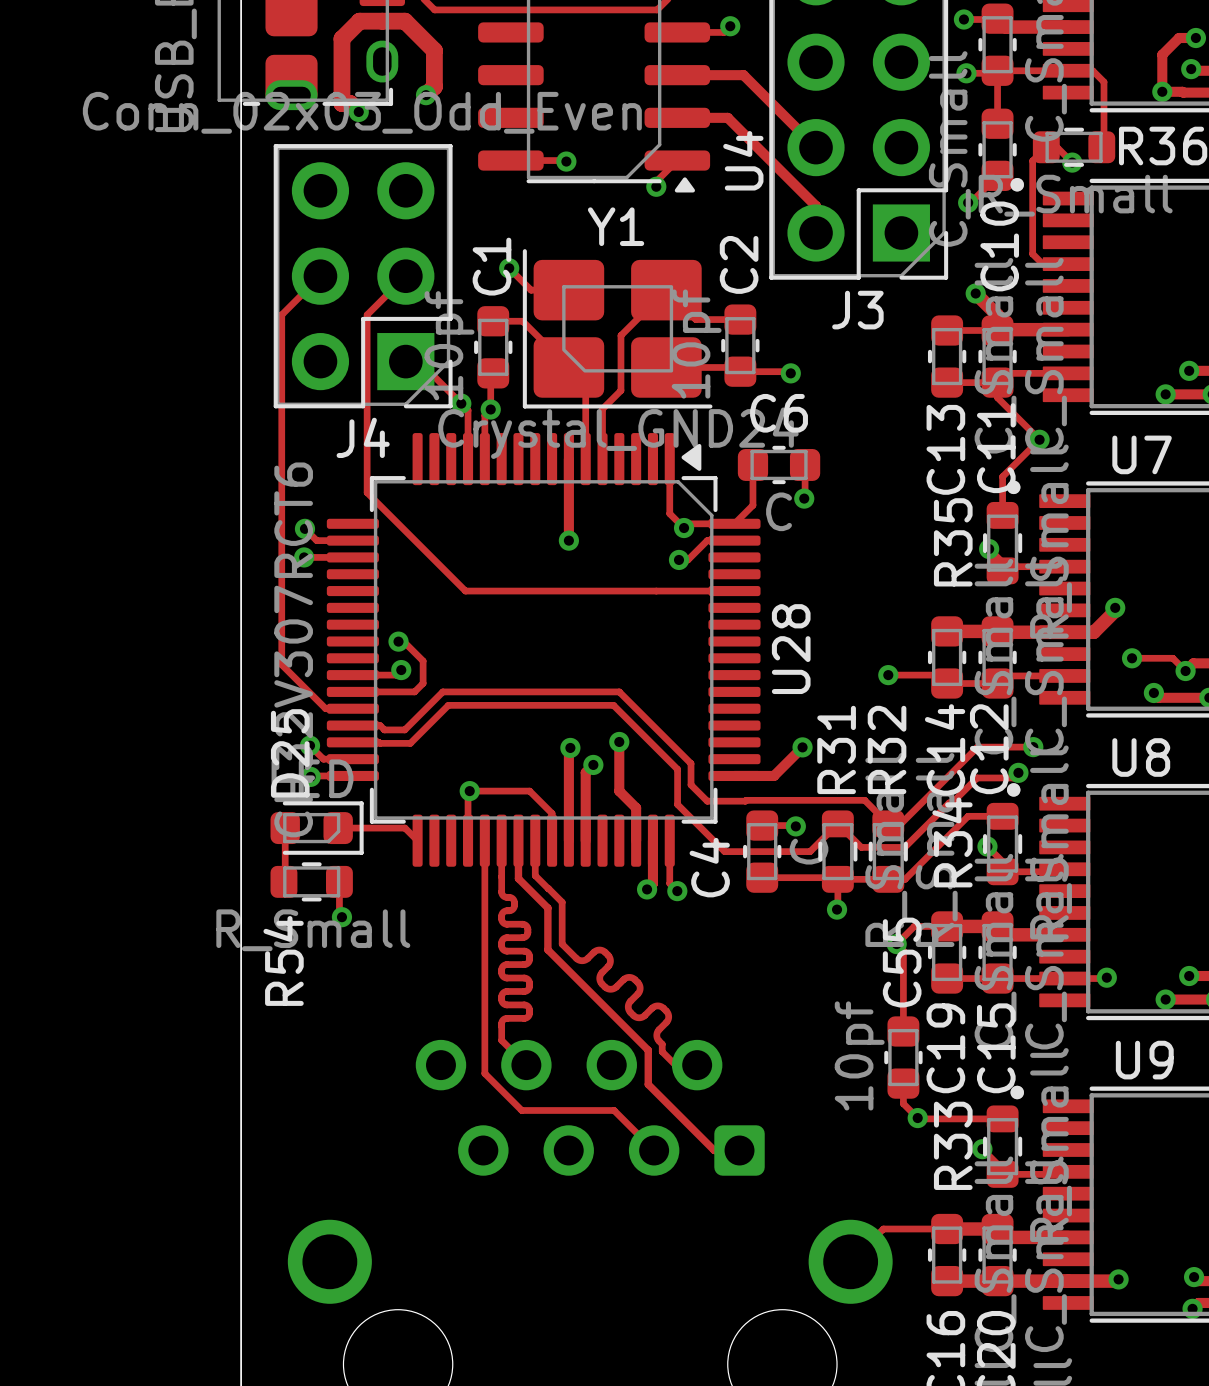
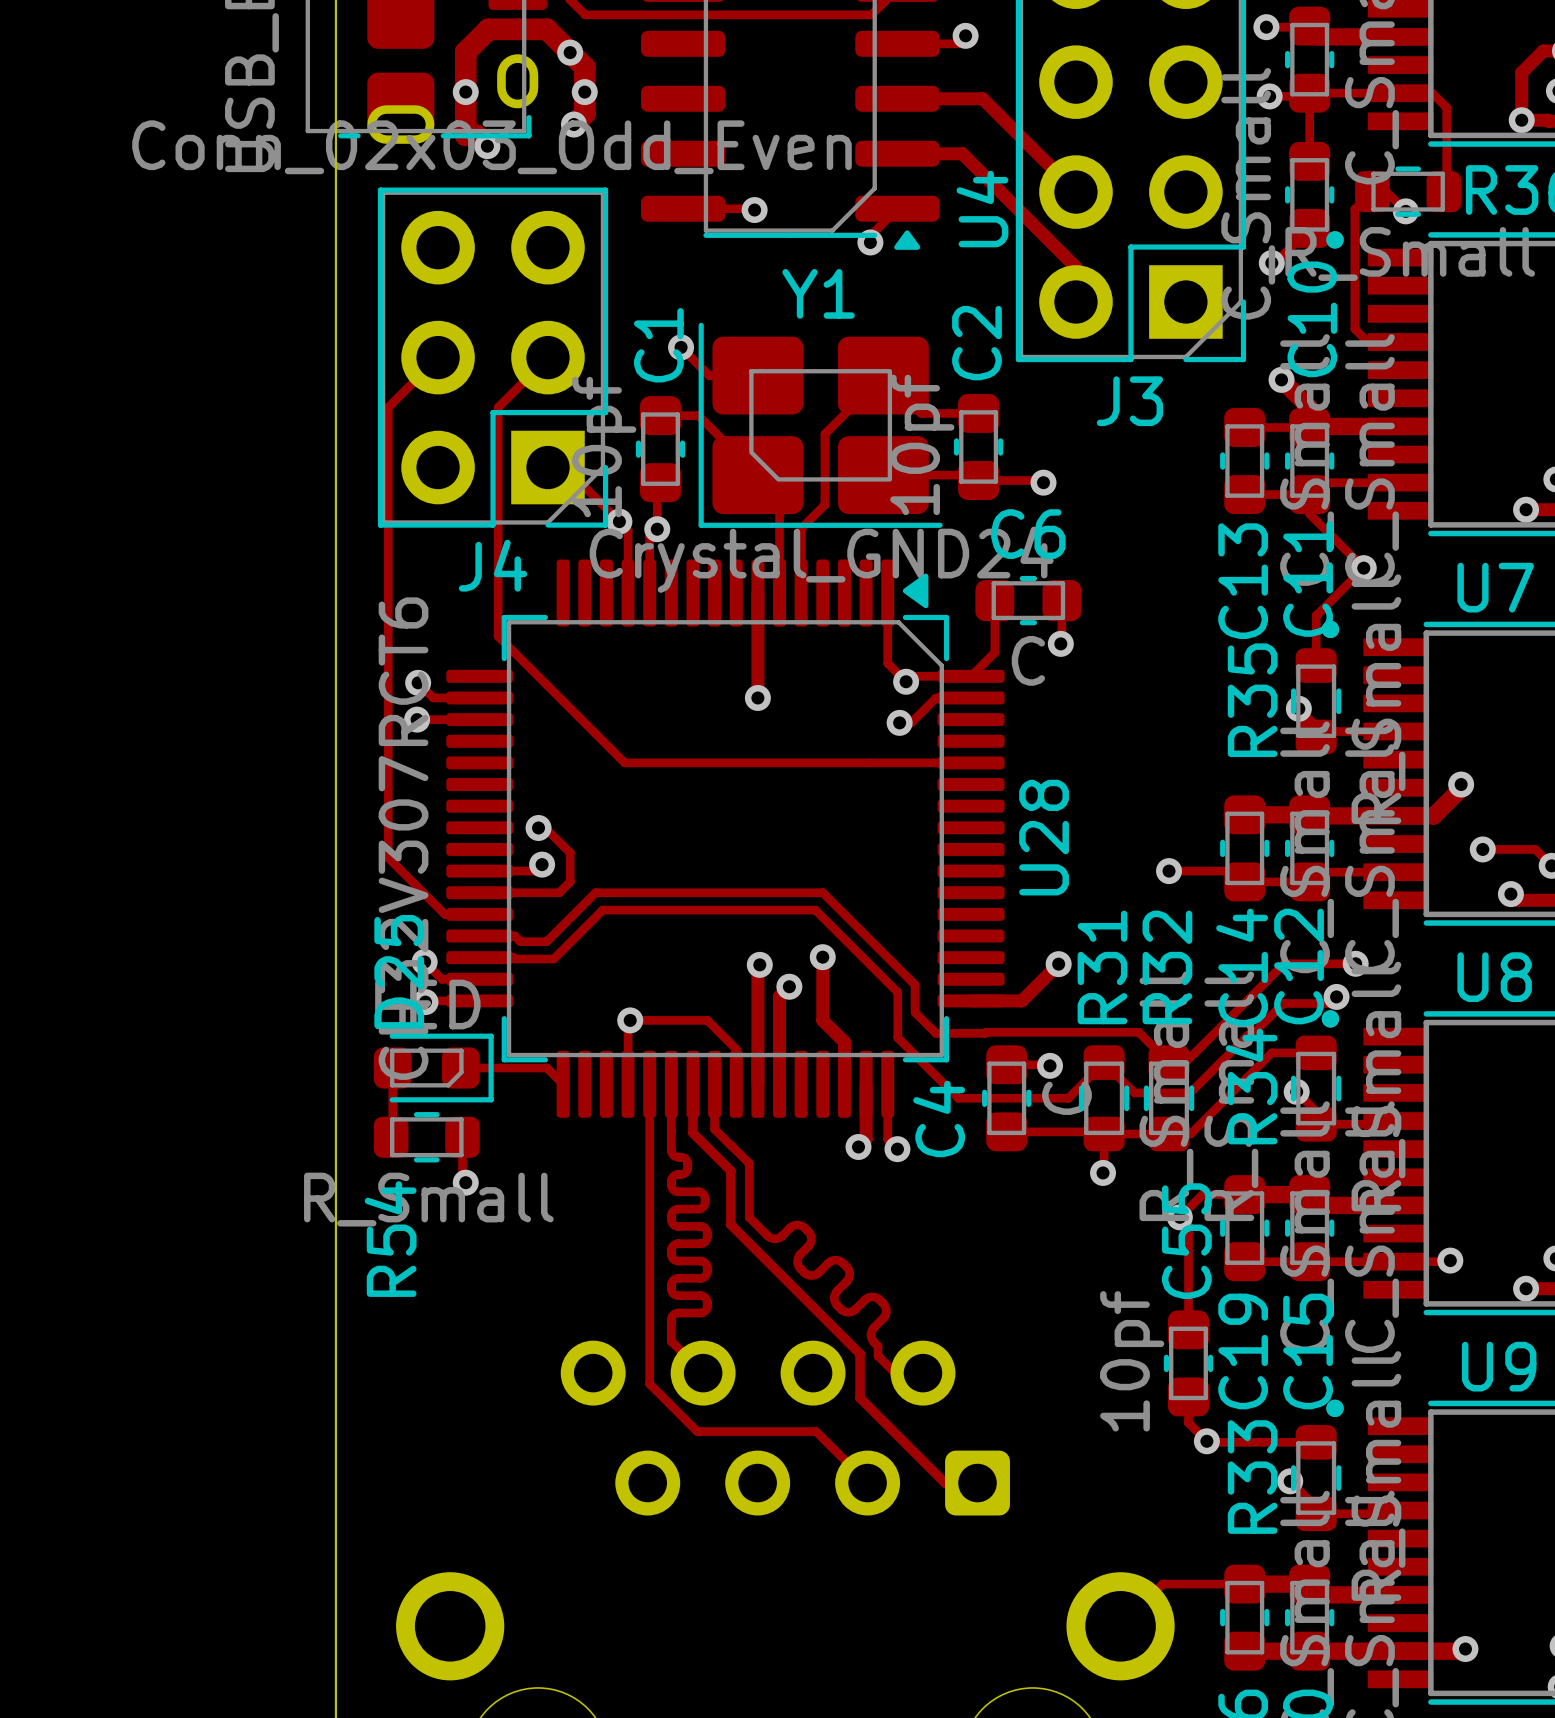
via: none -> (570, 52)
via: none -> (465, 92)
via: none -> (584, 92)

